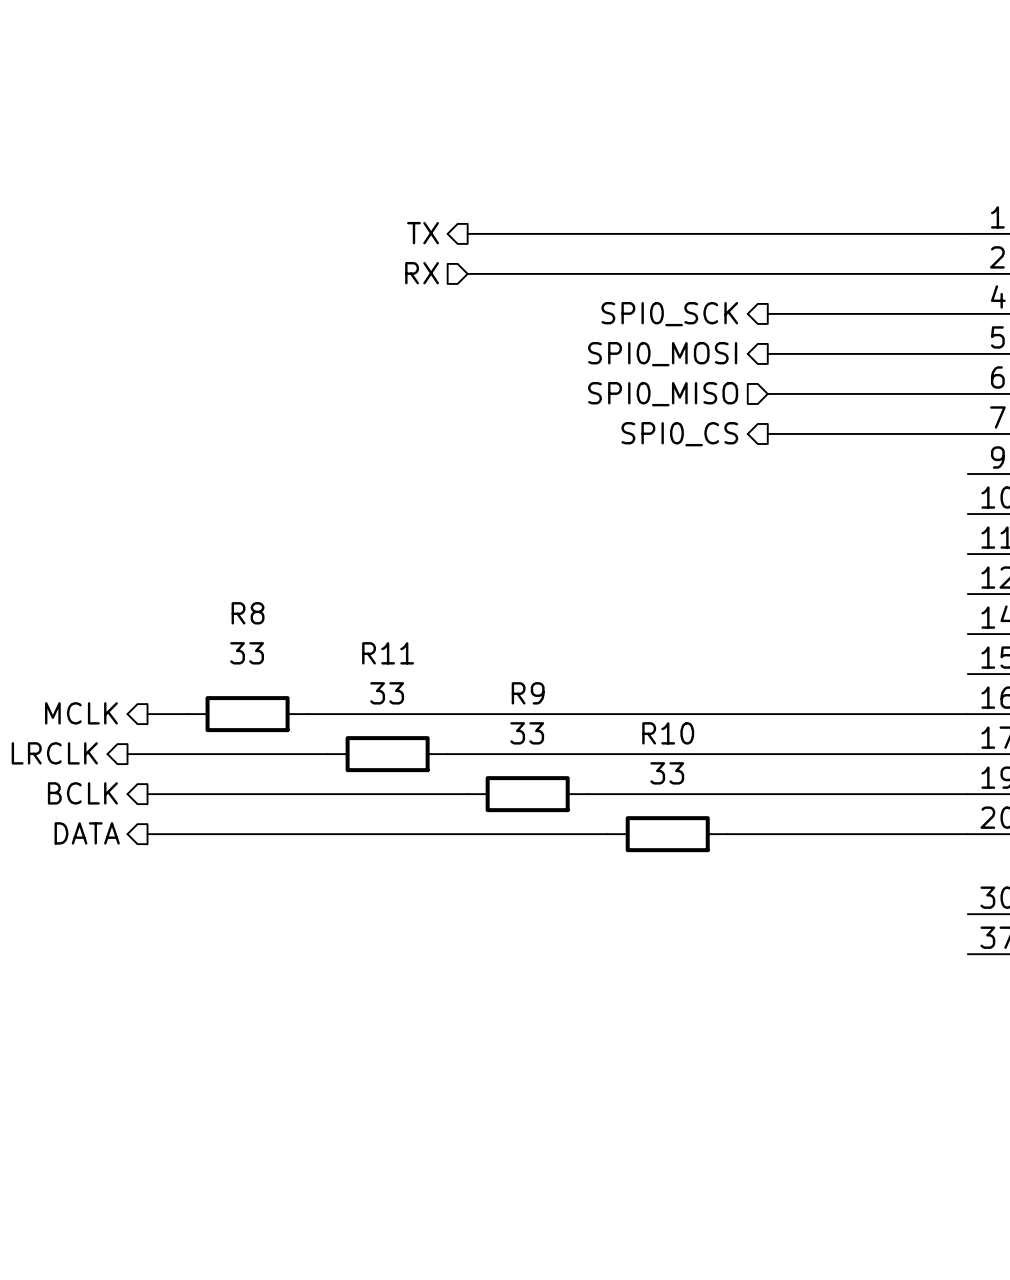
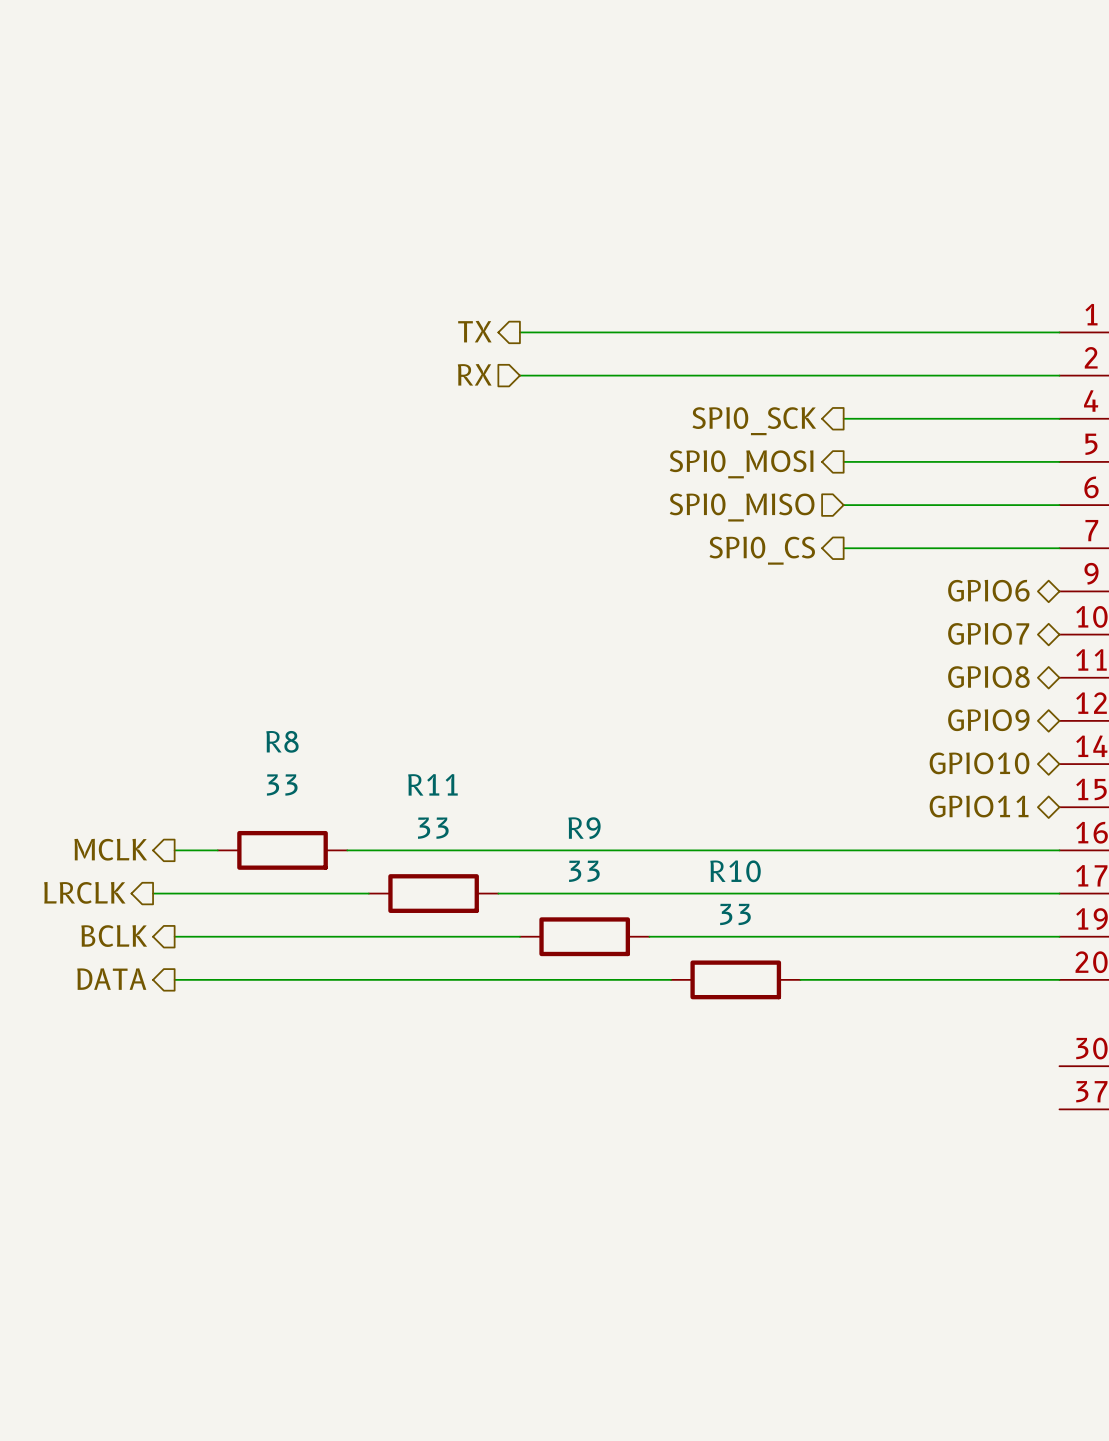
hierarchical label: none -> GPIO6 (988, 590)
hierarchical label: none -> GPIO7 (988, 633)
hierarchical label: none -> GPIO8 (988, 677)
hierarchical label: none -> GPIO9 (988, 720)
hierarchical label: none -> GPIO10 (979, 763)
hierarchical label: none -> GPIO11 (979, 806)

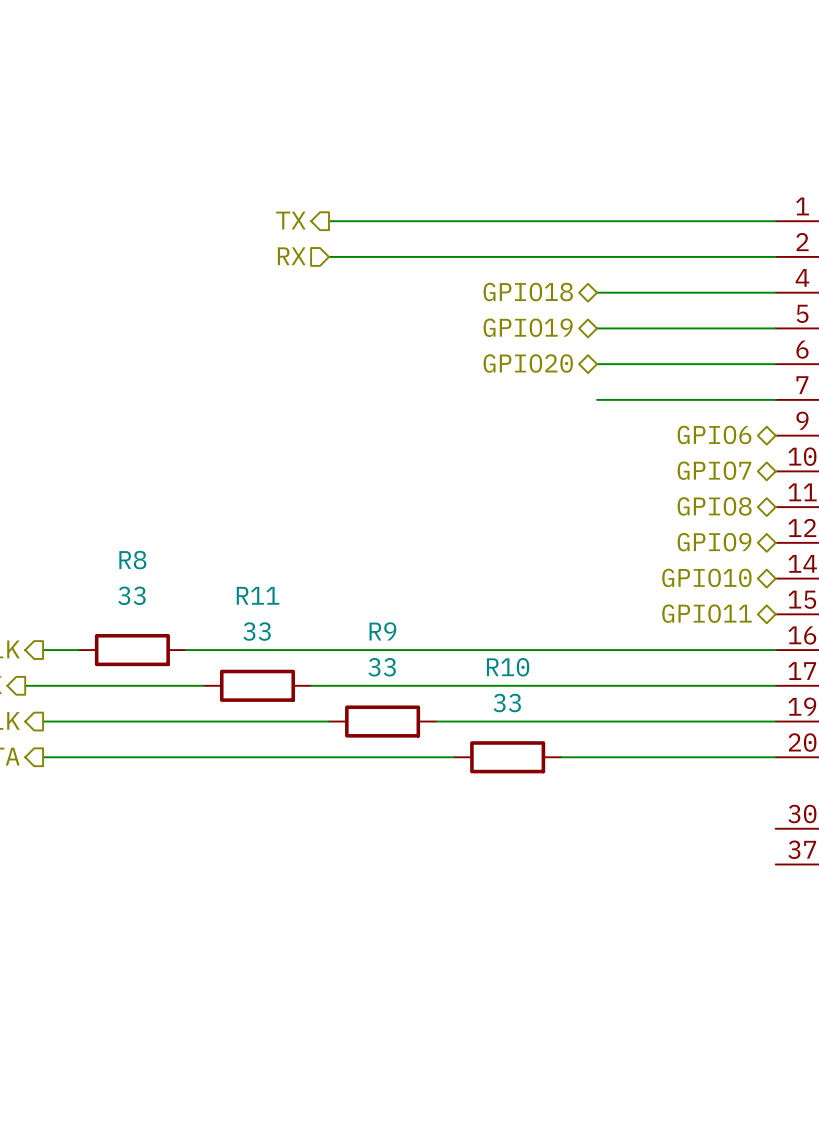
hierarchical label shape: output (754, 421) -> bidirectional (528, 292)
hierarchical label: SPI0_SCK (754, 421) -> GPIO18 (528, 292)
hierarchical label shape: output (741, 464) -> bidirectional (528, 327)
hierarchical label: SPI0_MOSI (741, 464) -> GPIO19 (528, 327)
hierarchical label shape: input (742, 507) -> bidirectional (528, 363)
hierarchical label: SPI0_MISO (742, 507) -> GPIO20 (528, 363)
hierarchical label: SPI0_CS (762, 550) -> none

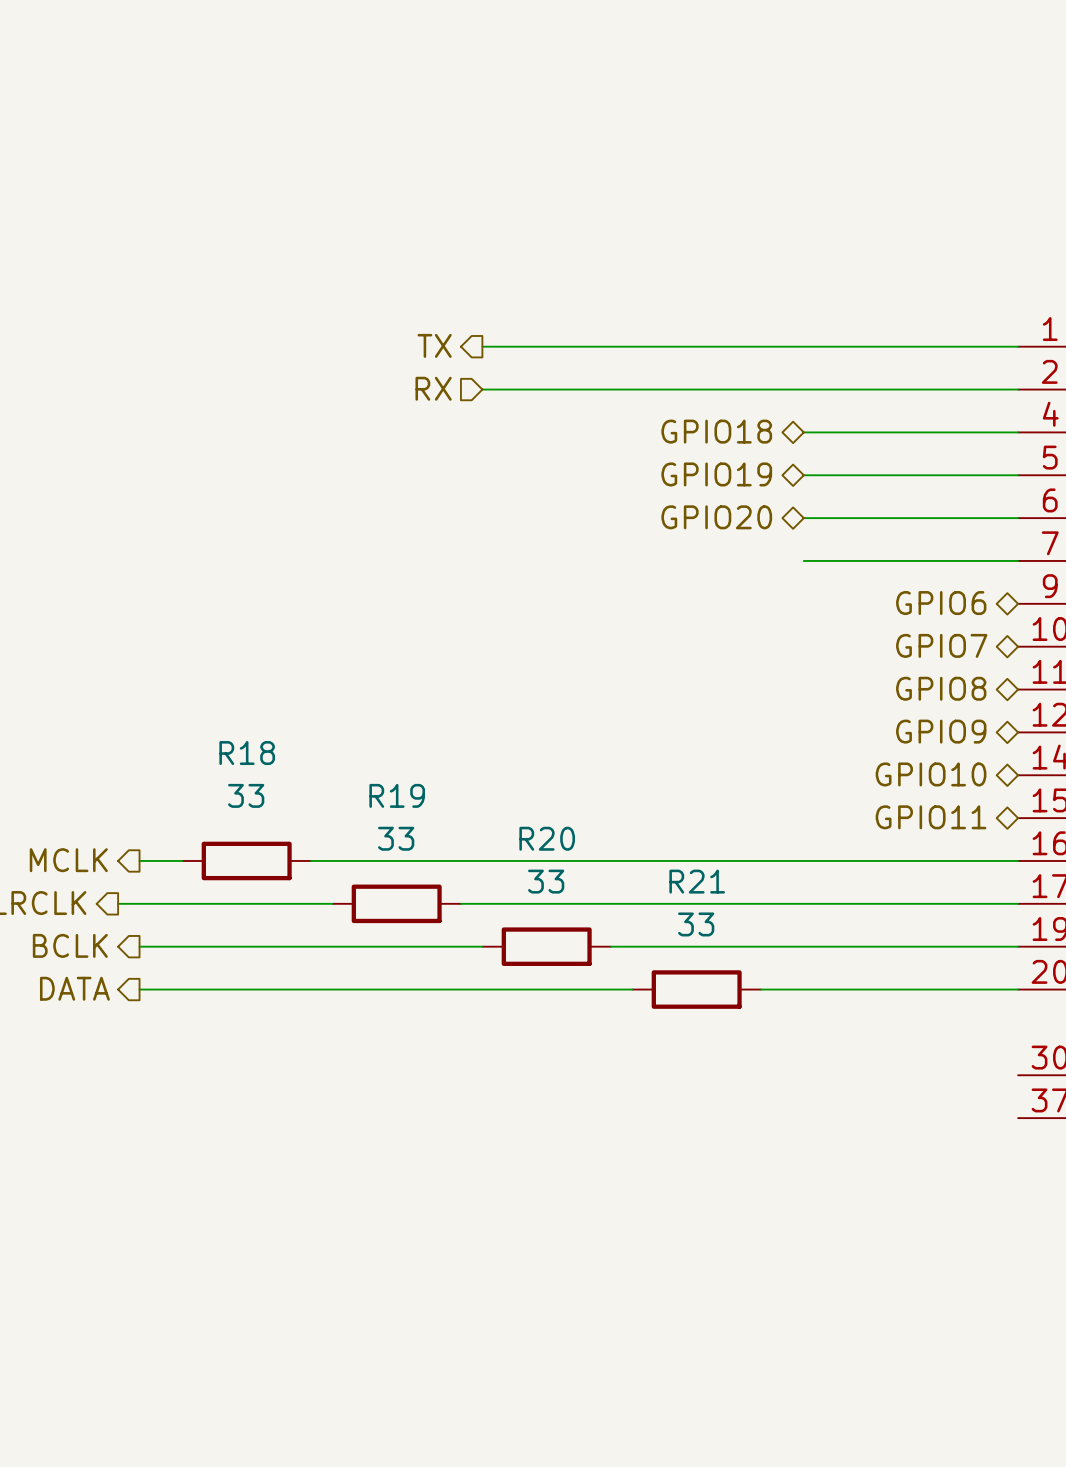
R8 name: R8 (132, 560) -> R18 (247, 753)
R11 name: R11 (258, 595) -> R19 (397, 795)
R9 name: R9 (382, 631) -> R20 (547, 838)
R10 name: R10 (508, 667) -> R21 (697, 881)

